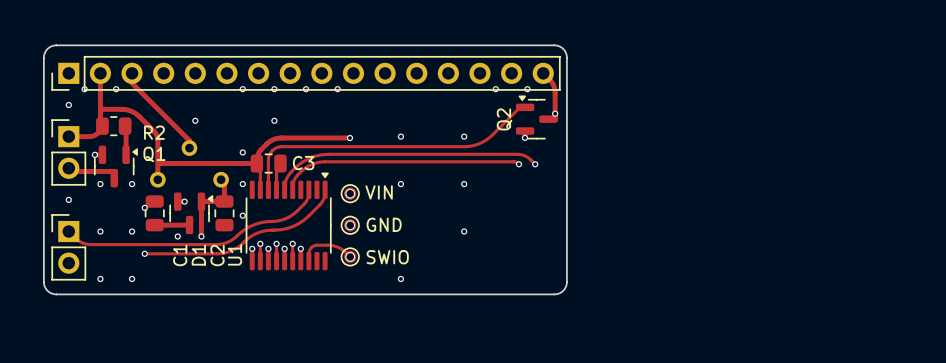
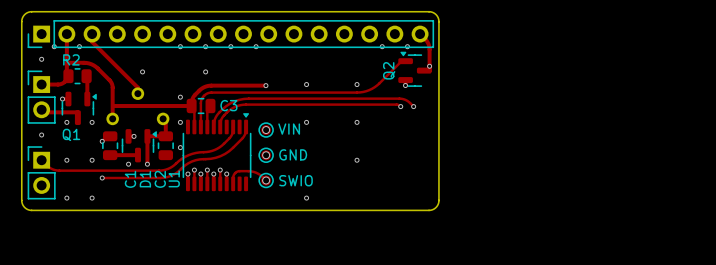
R2 name position: R2 (154, 132) -> R2 (71, 59)
Q1 name position: Q1 (154, 154) -> Q1 (71, 134)

